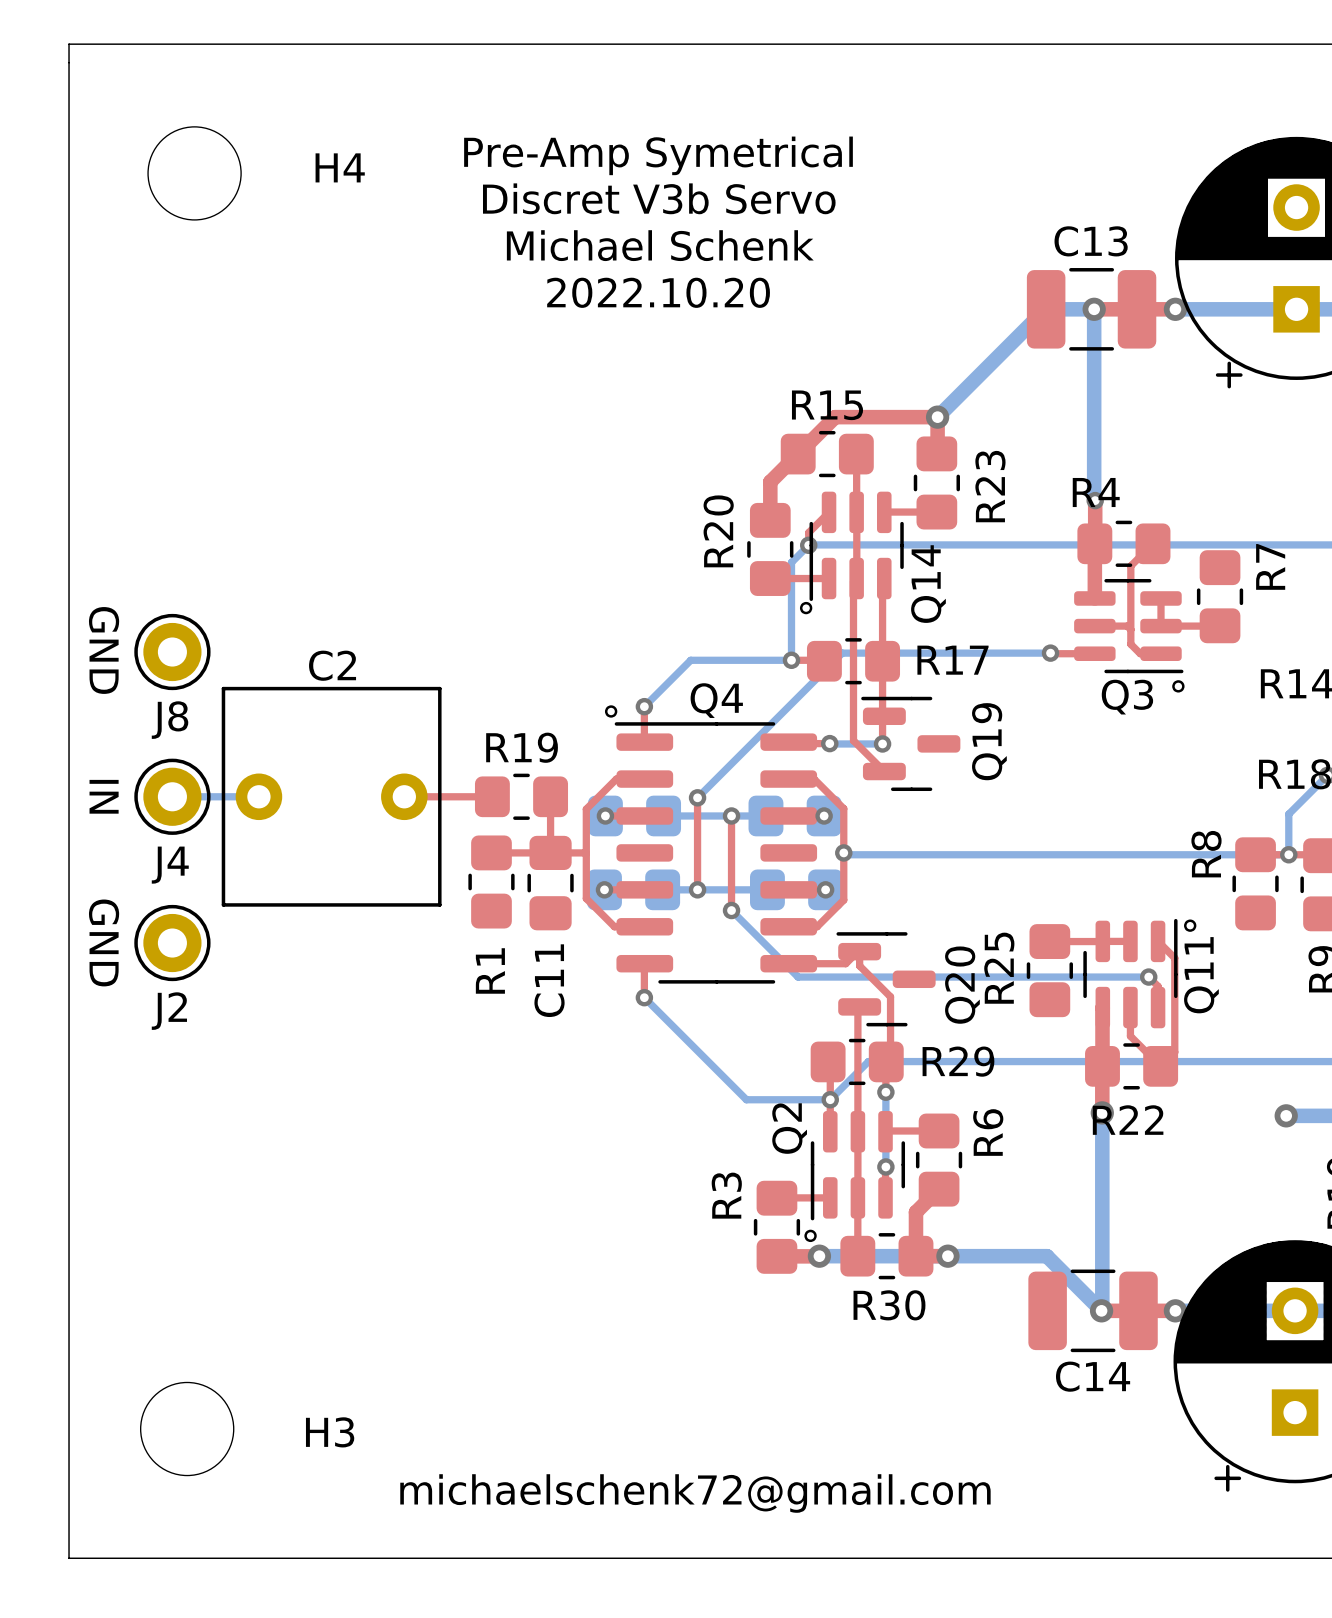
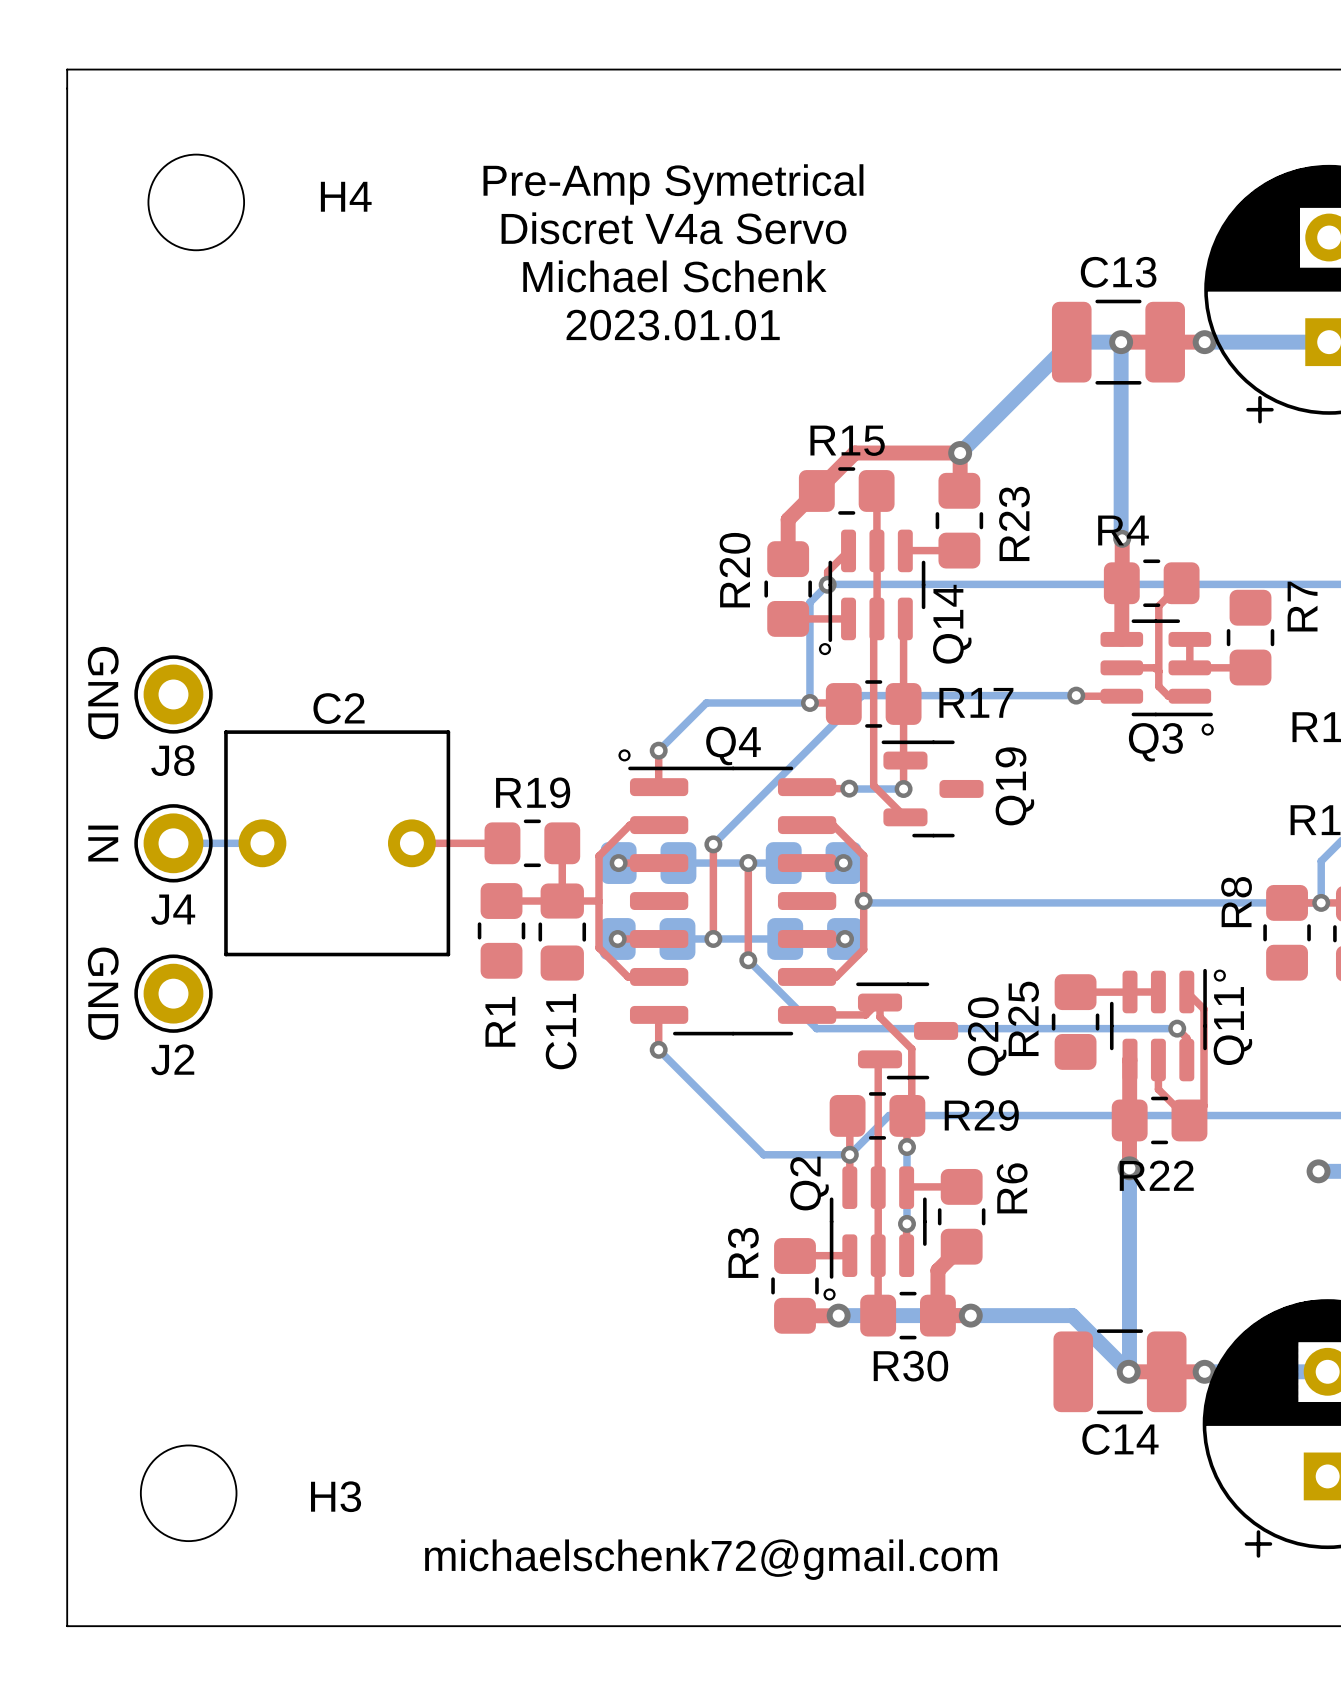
text: Discret V3b Servo (659, 198) -> Discret V4a Servo (674, 228)
text: 2022.10.20 (658, 292) -> 2023.01.01 (673, 325)

